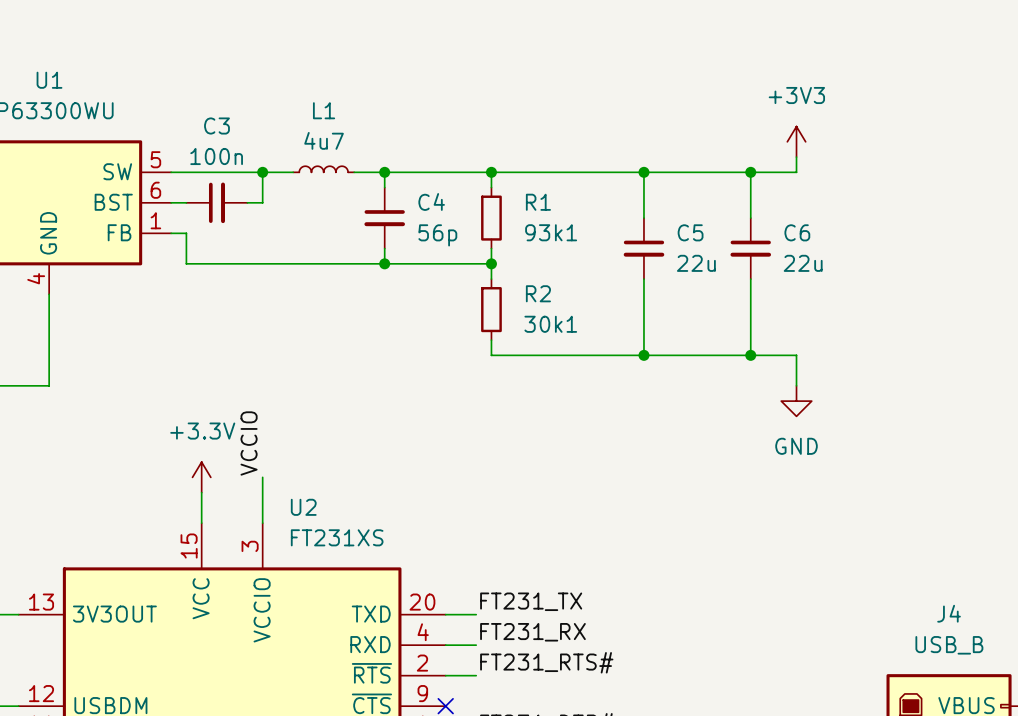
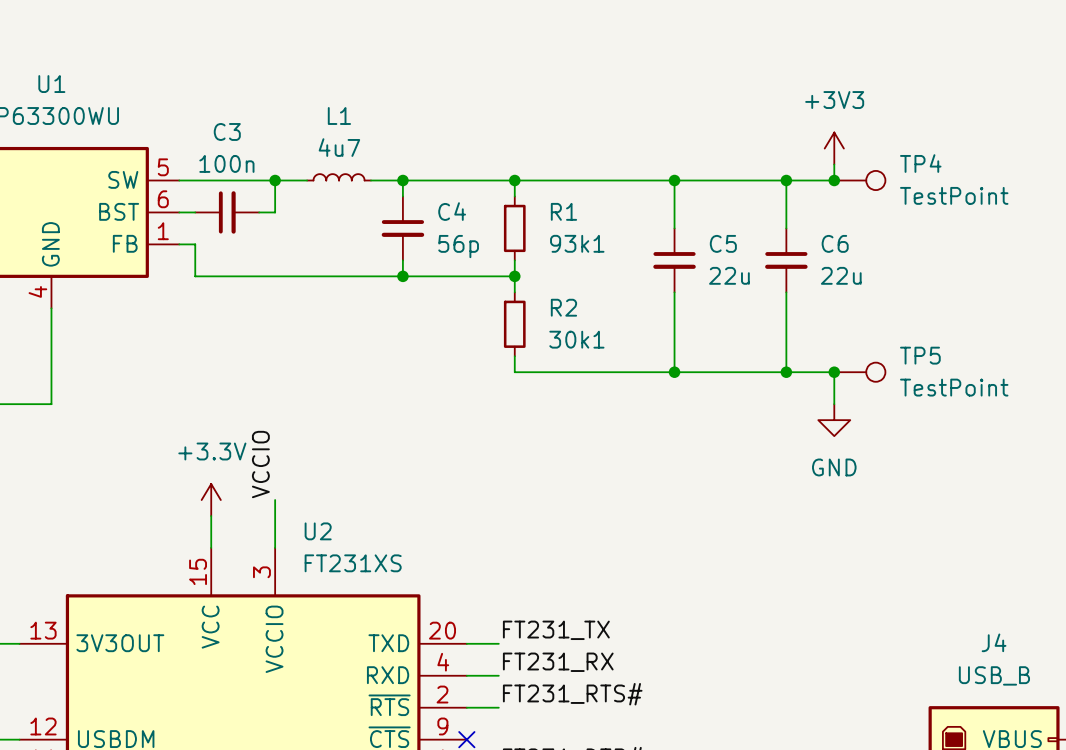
junction: none -> (834, 180)
TP4: none -> TestPoint (859, 180)
junction: none -> (834, 372)
TP5: none -> TestPoint (859, 372)

